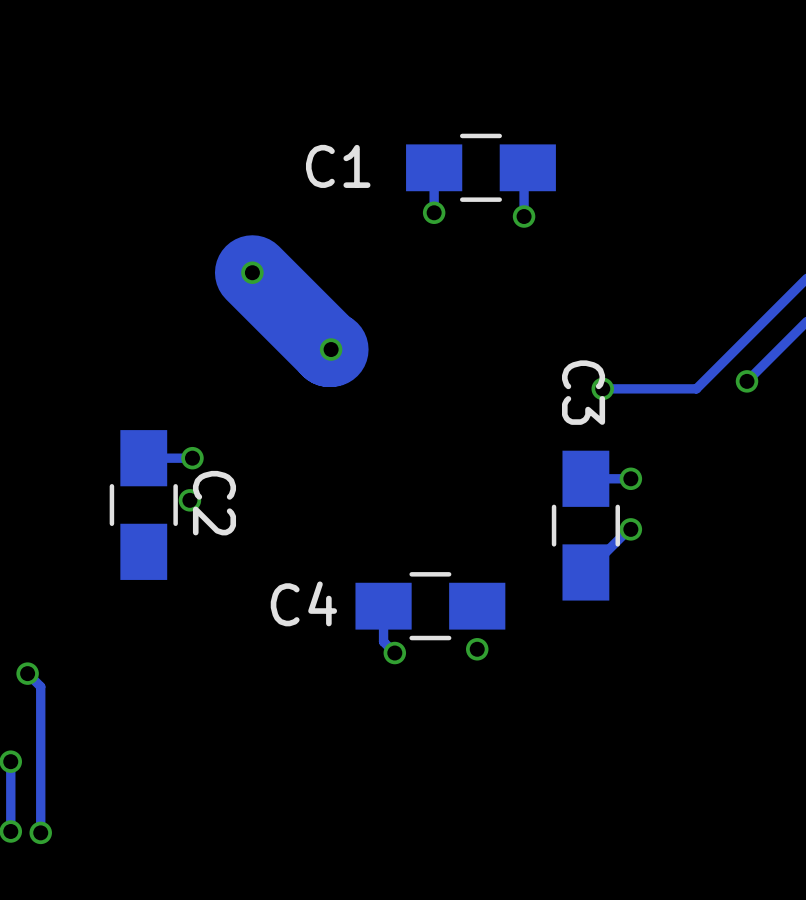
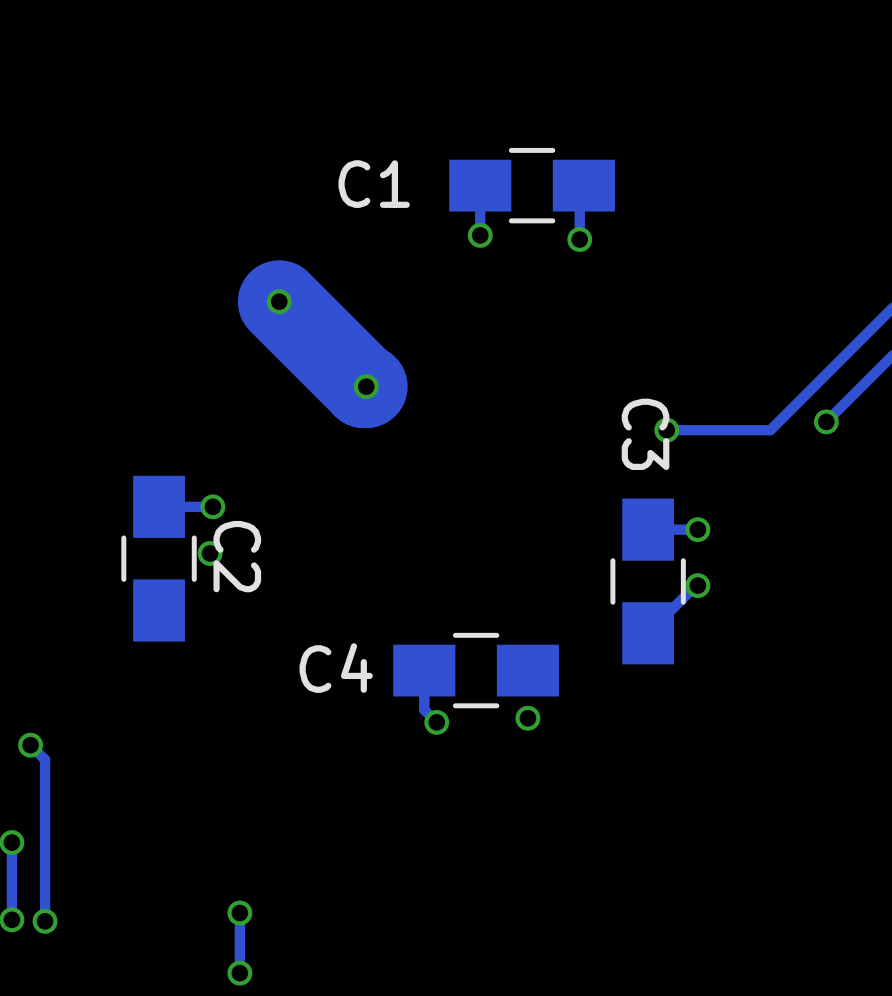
track: none -> (239, 913) (239, 973)
via: none -> (239, 913)
via: none -> (239, 973)

